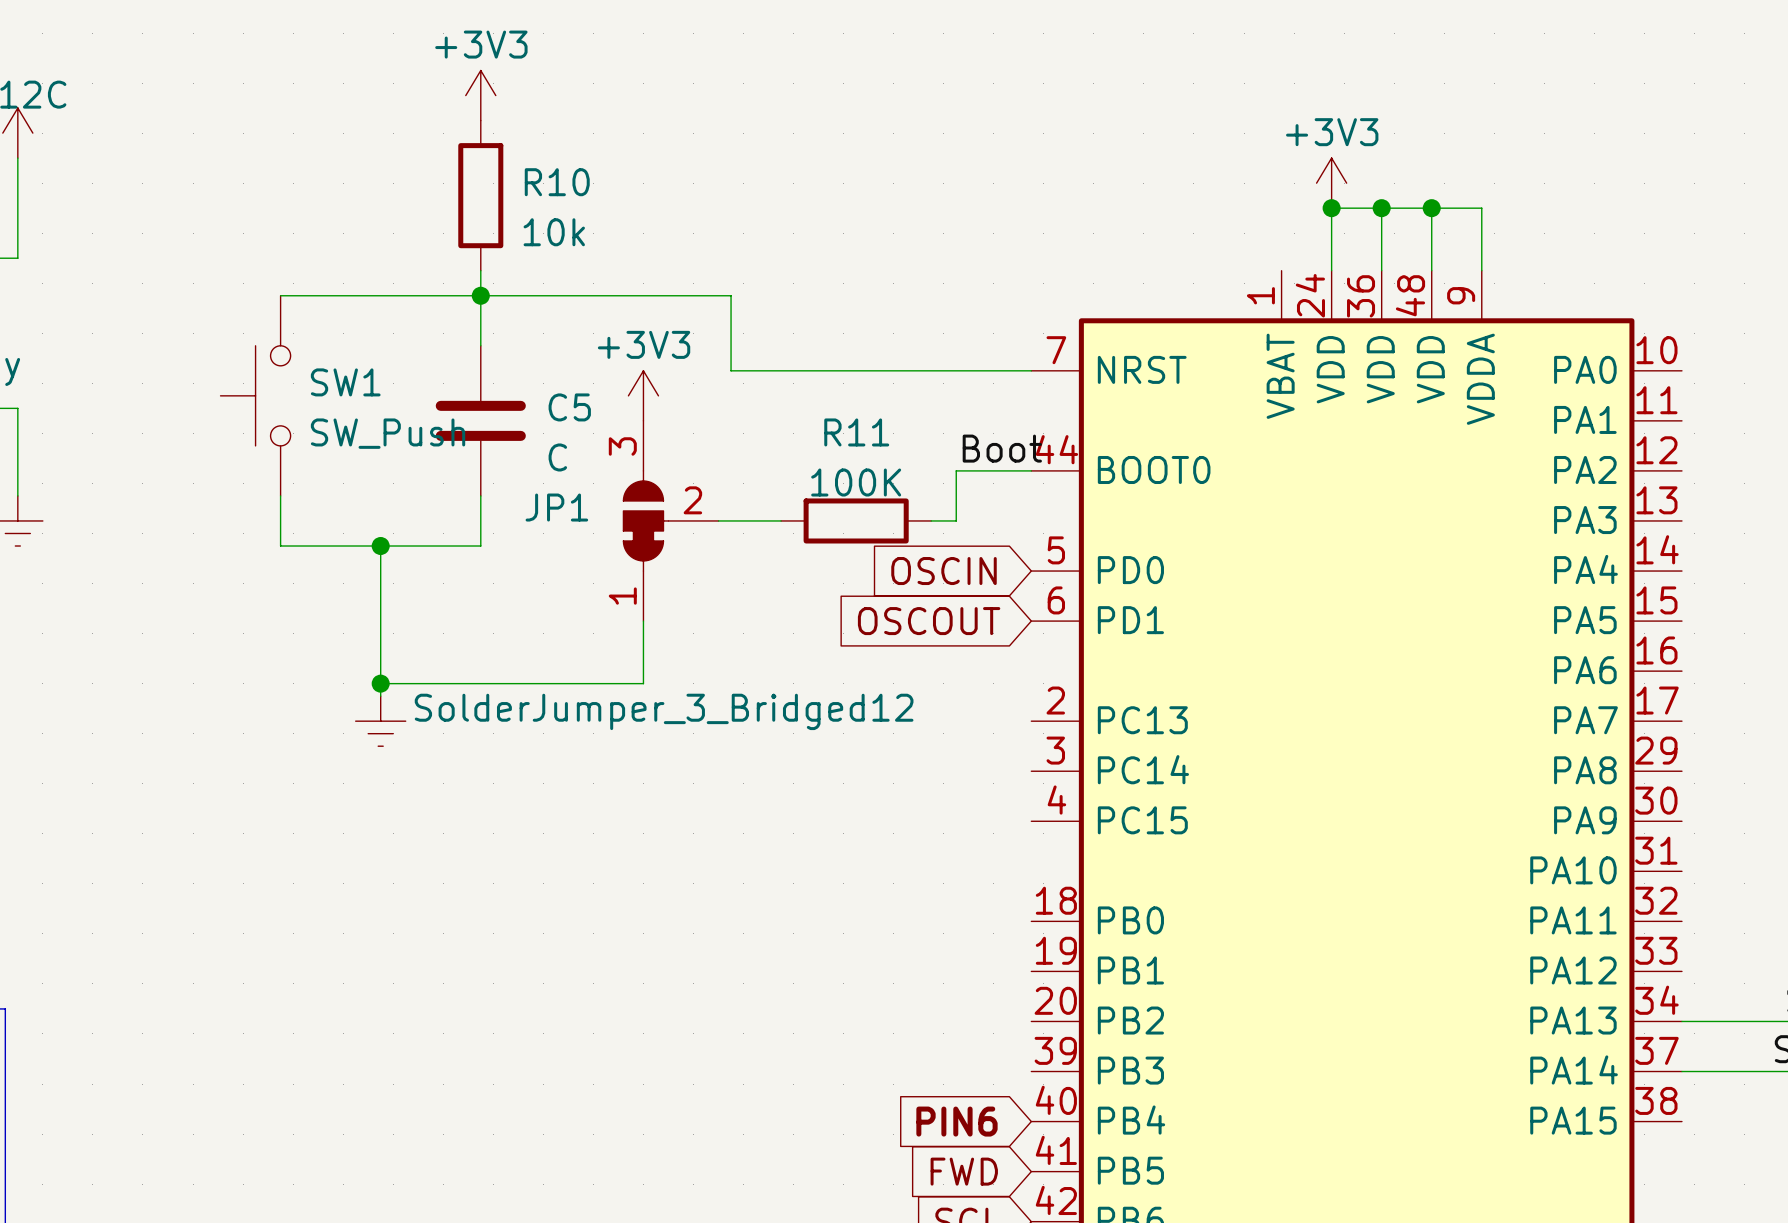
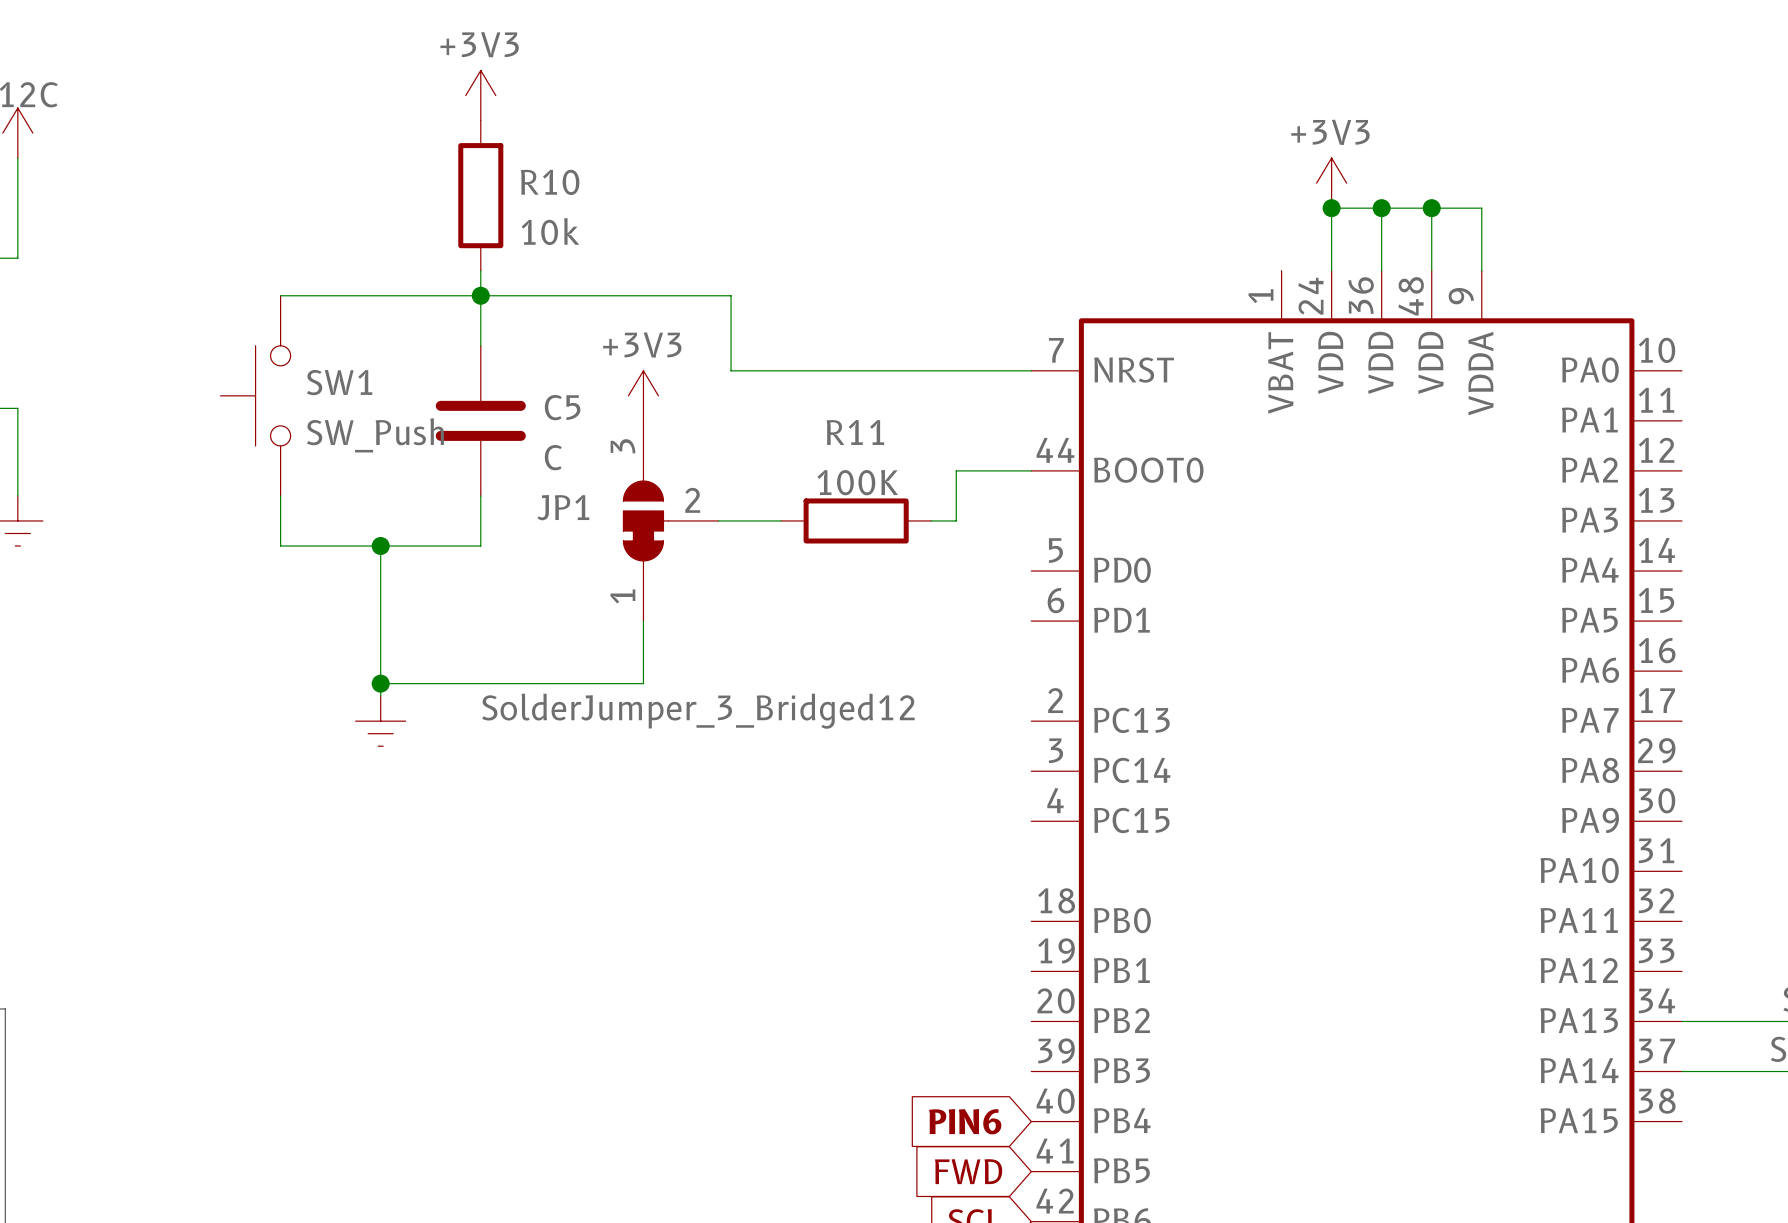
label: Boot (1002, 448) -> none
global label: OSCIN (944, 571) -> none
global label: OSCOUT (929, 621) -> none

